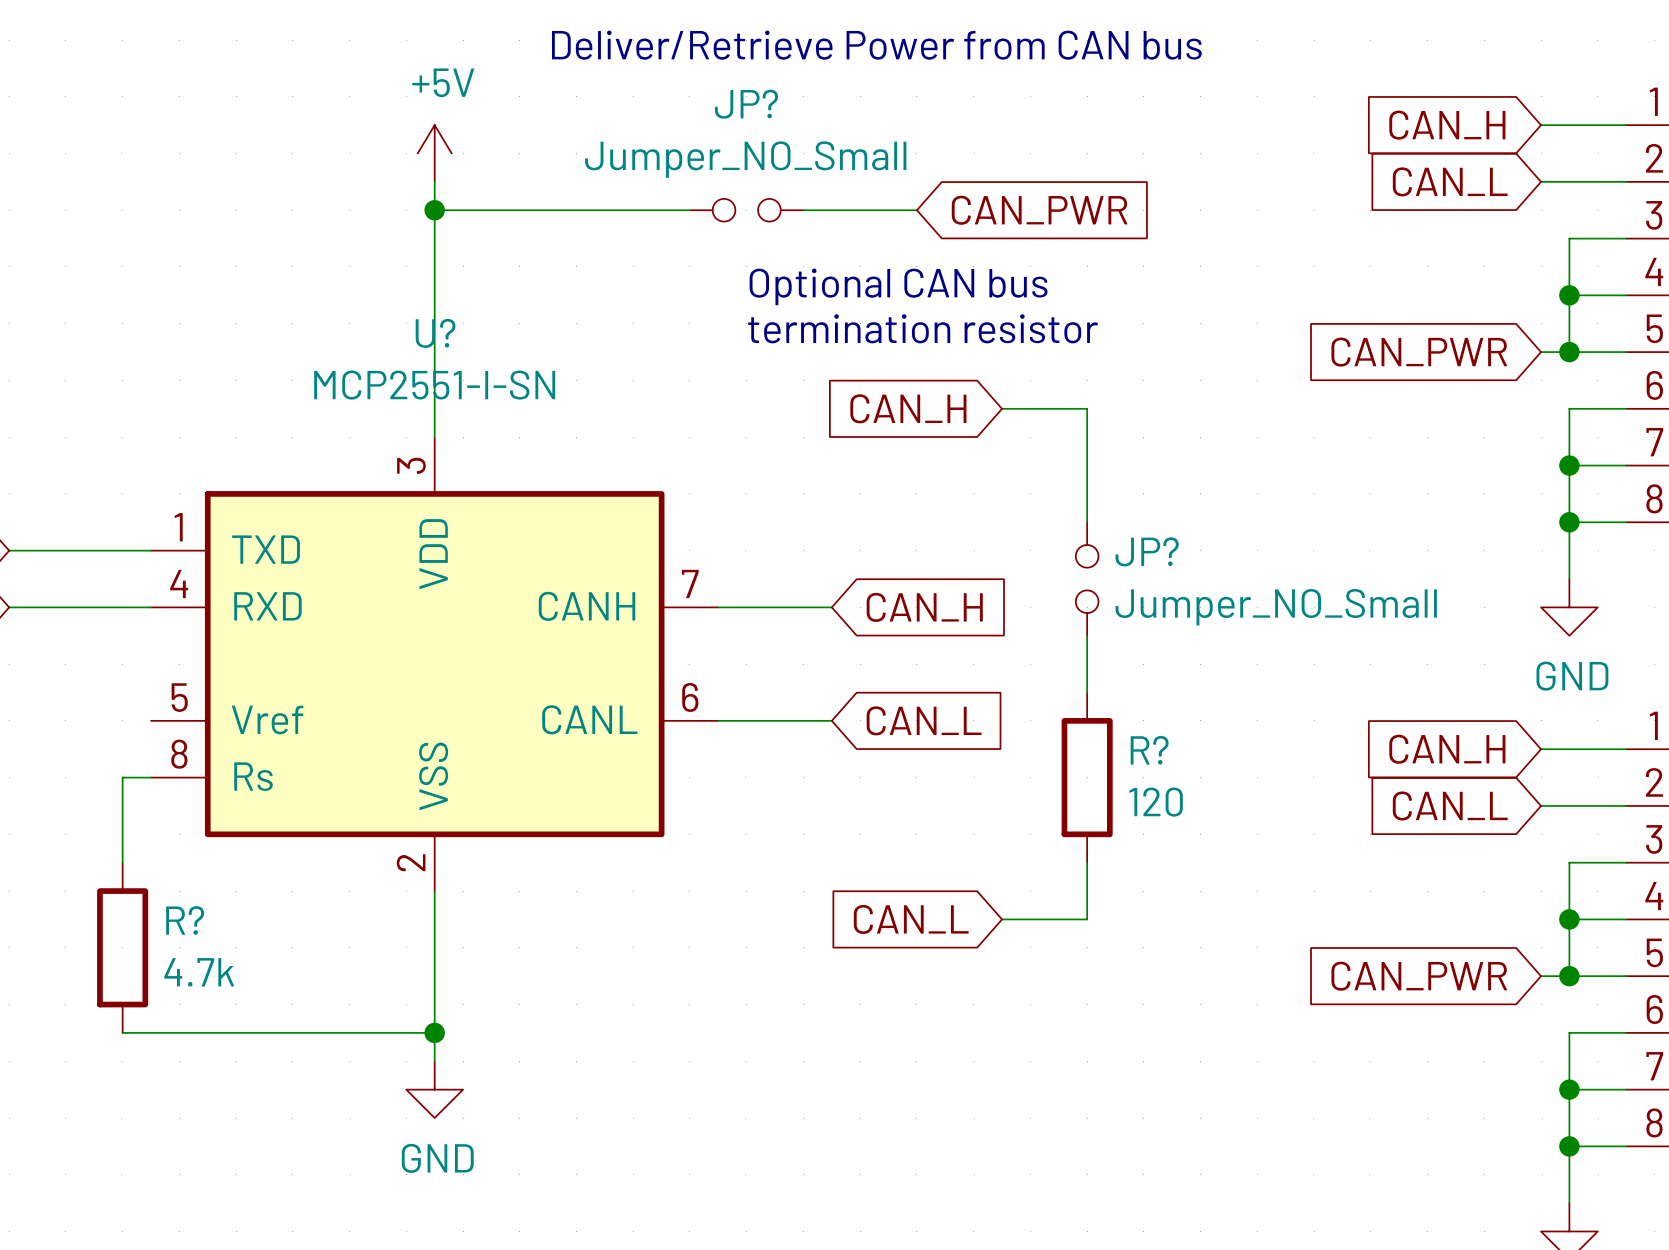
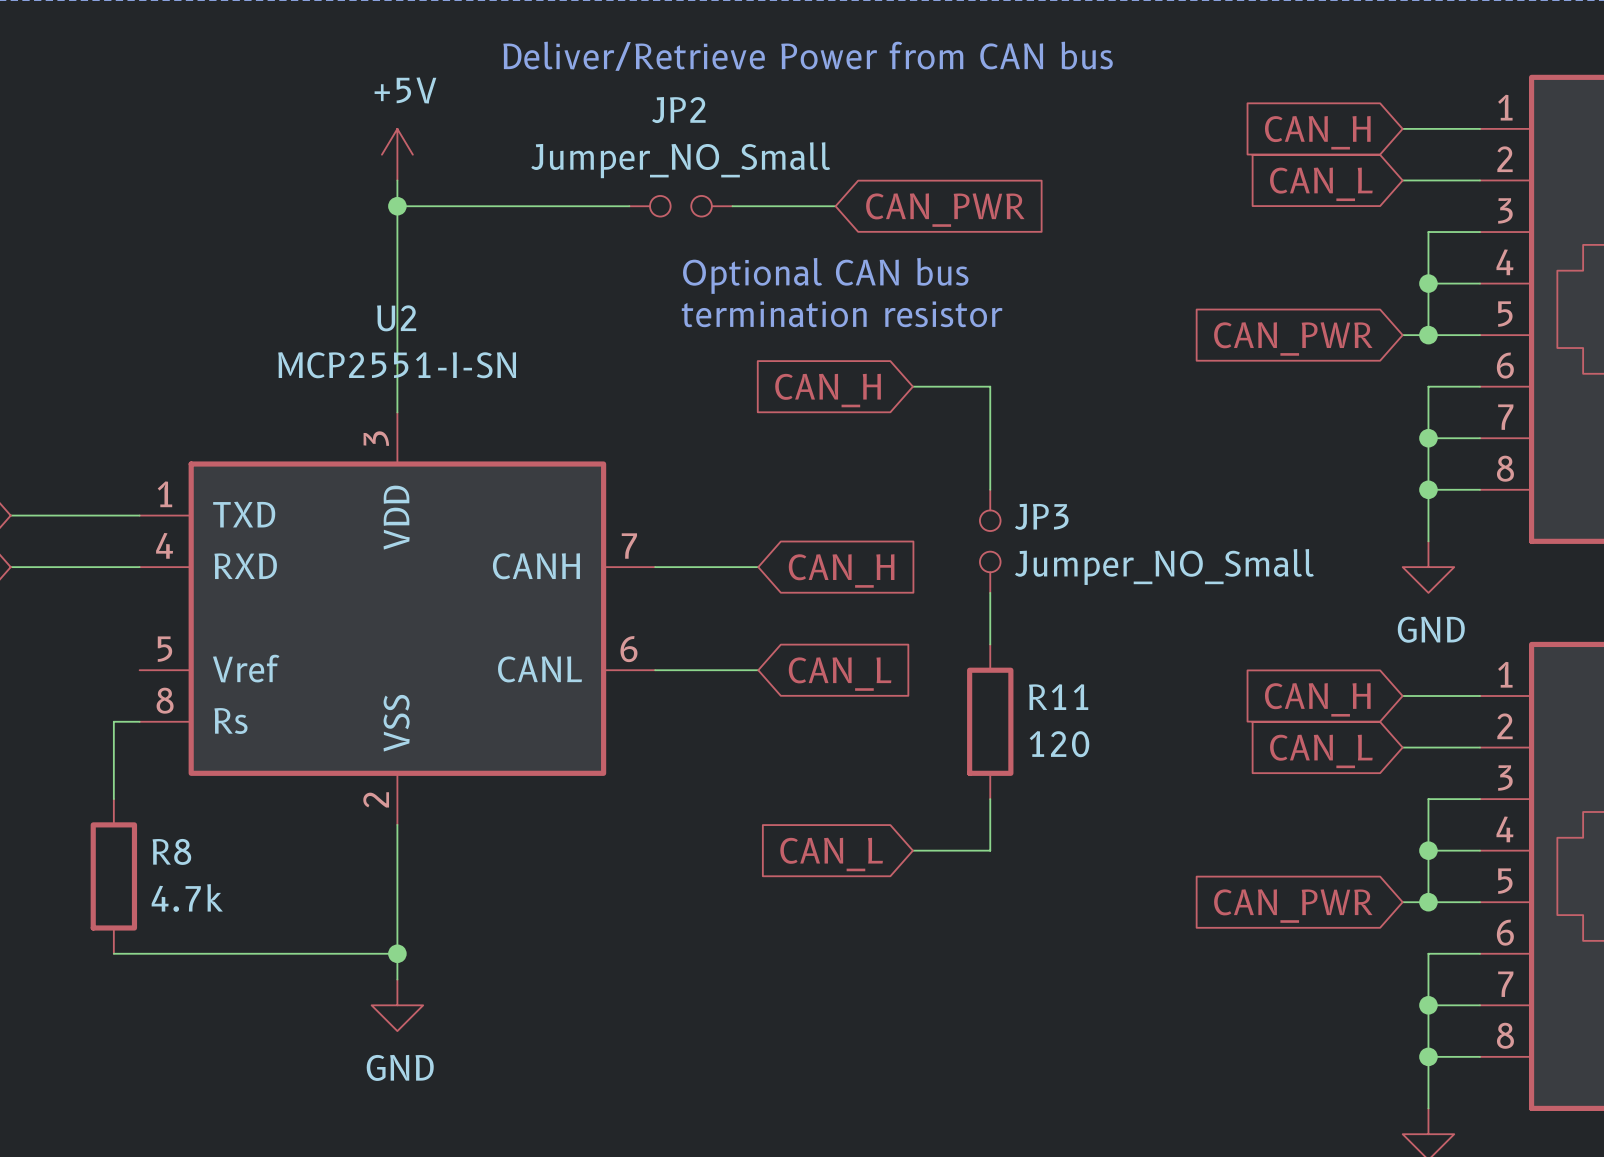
JP? name: JP? (746, 104) -> JP2 (678, 110)
U? name: U? (435, 333) -> U2 (396, 318)
JP? name: JP? (1147, 551) -> JP3 (1041, 516)
R? name: R? (1149, 750) -> R11 (1058, 697)
R? name: R? (185, 920) -> R8 (171, 851)

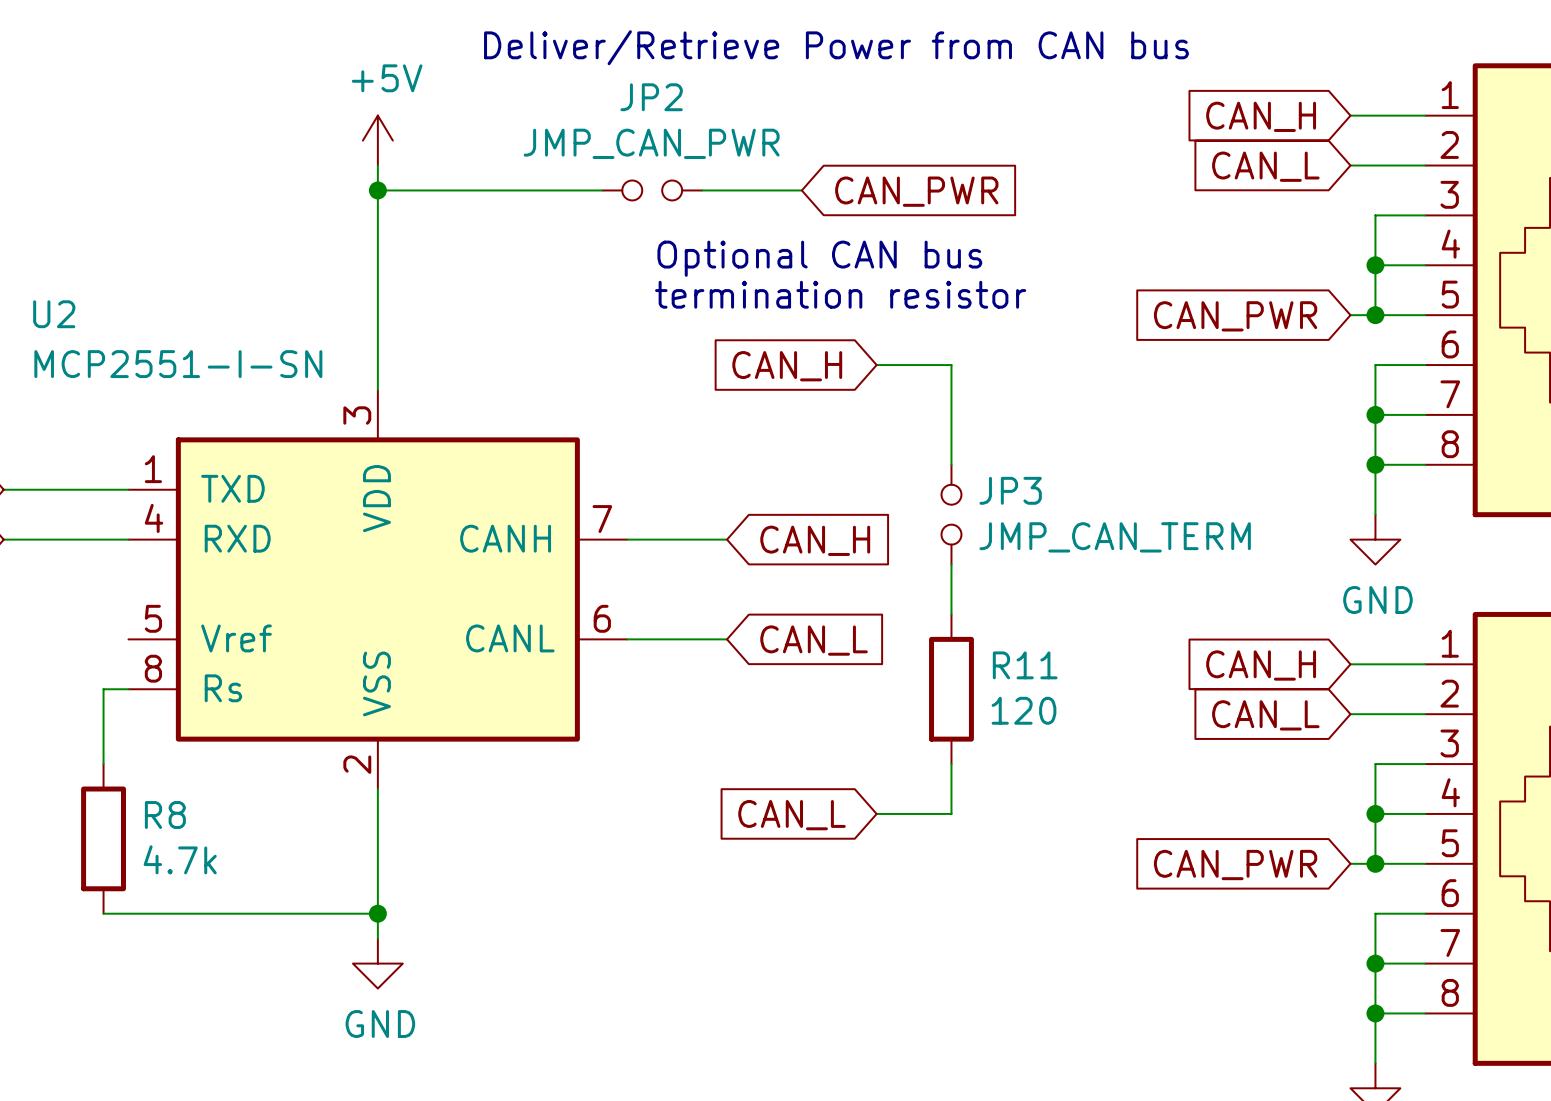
JP2 value: Jumper_NO_Small (680, 160) -> JMP_CAN_PWR (651, 143)
U2 name position: U2 (396, 318) -> U2 (54, 314)
U2 value position: MCP2551-I-SN (397, 365) -> MCP2551-I-SN (178, 364)
JP3 value: Jumper_NO_Small (1164, 566) -> JMP_CAN_TERM (1115, 537)

